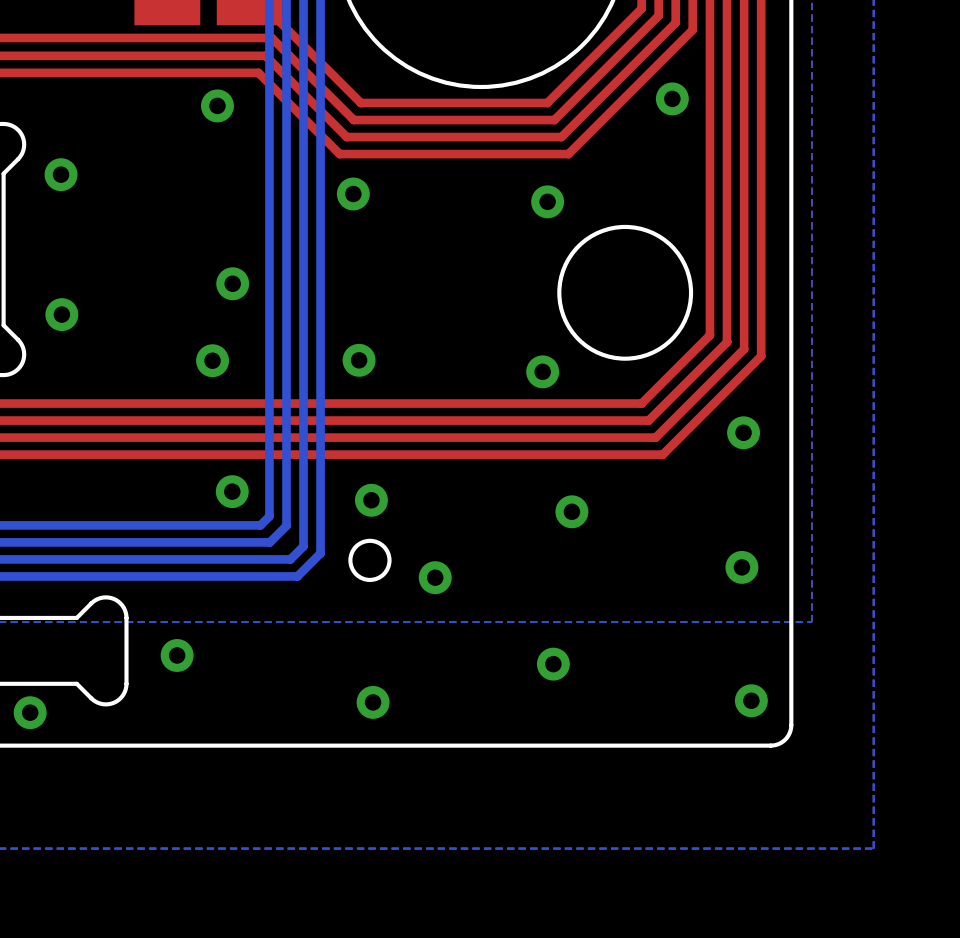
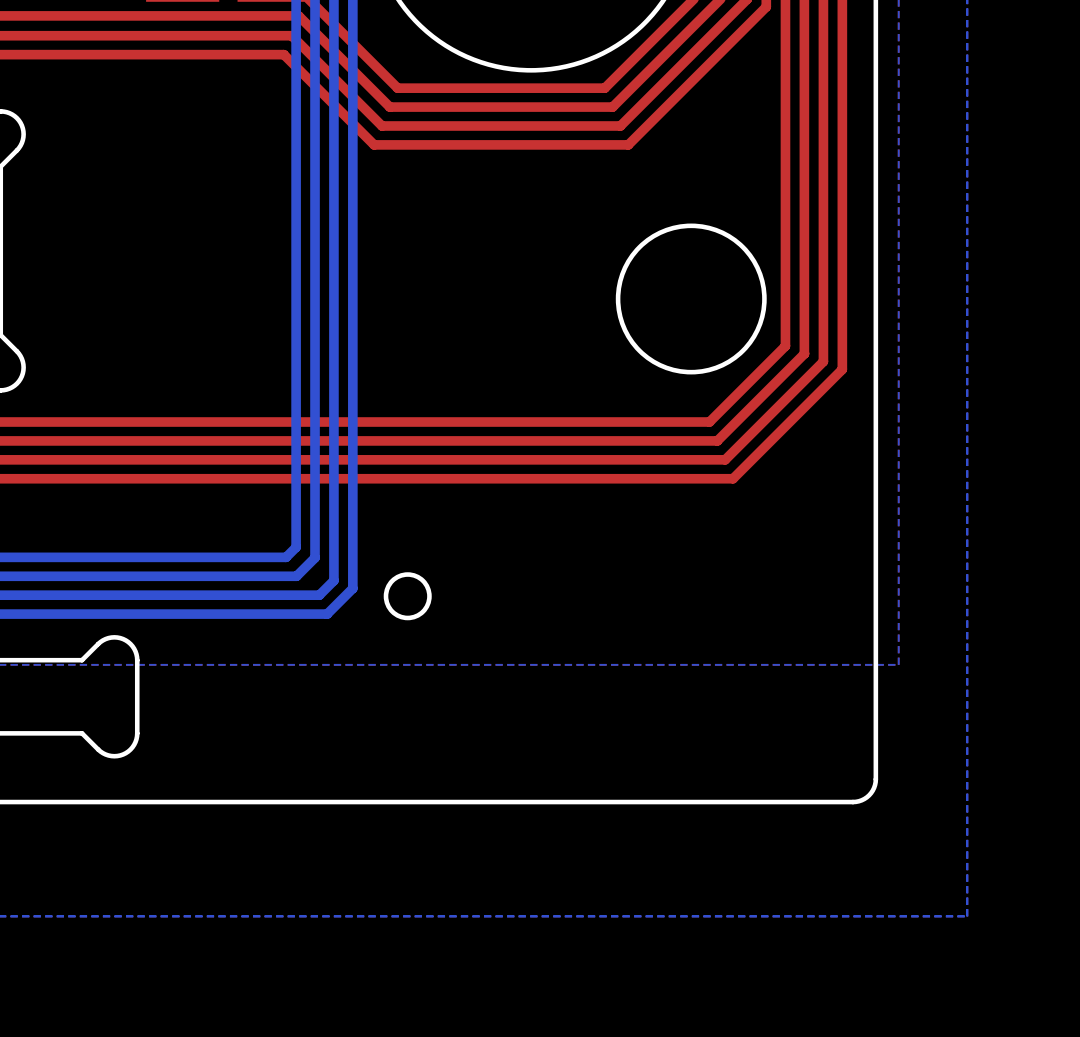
via: (672, 98) -> none
via: (217, 105) -> none
via: (61, 174) -> none
via: (353, 194) -> none
via: (547, 201) -> none
via: (232, 283) -> none
via: (61, 314) -> none
via: (212, 360) -> none
via: (359, 360) -> none
via: (542, 371) -> none
via: (743, 432) -> none
via: (232, 491) -> none
via: (371, 500) -> none
via: (571, 511) -> none
via: (741, 567) -> none
via: (435, 577) -> none
via: (177, 655) -> none
via: (553, 664) -> none
via: (751, 700) -> none
via: (373, 702) -> none
via: (30, 712) -> none

